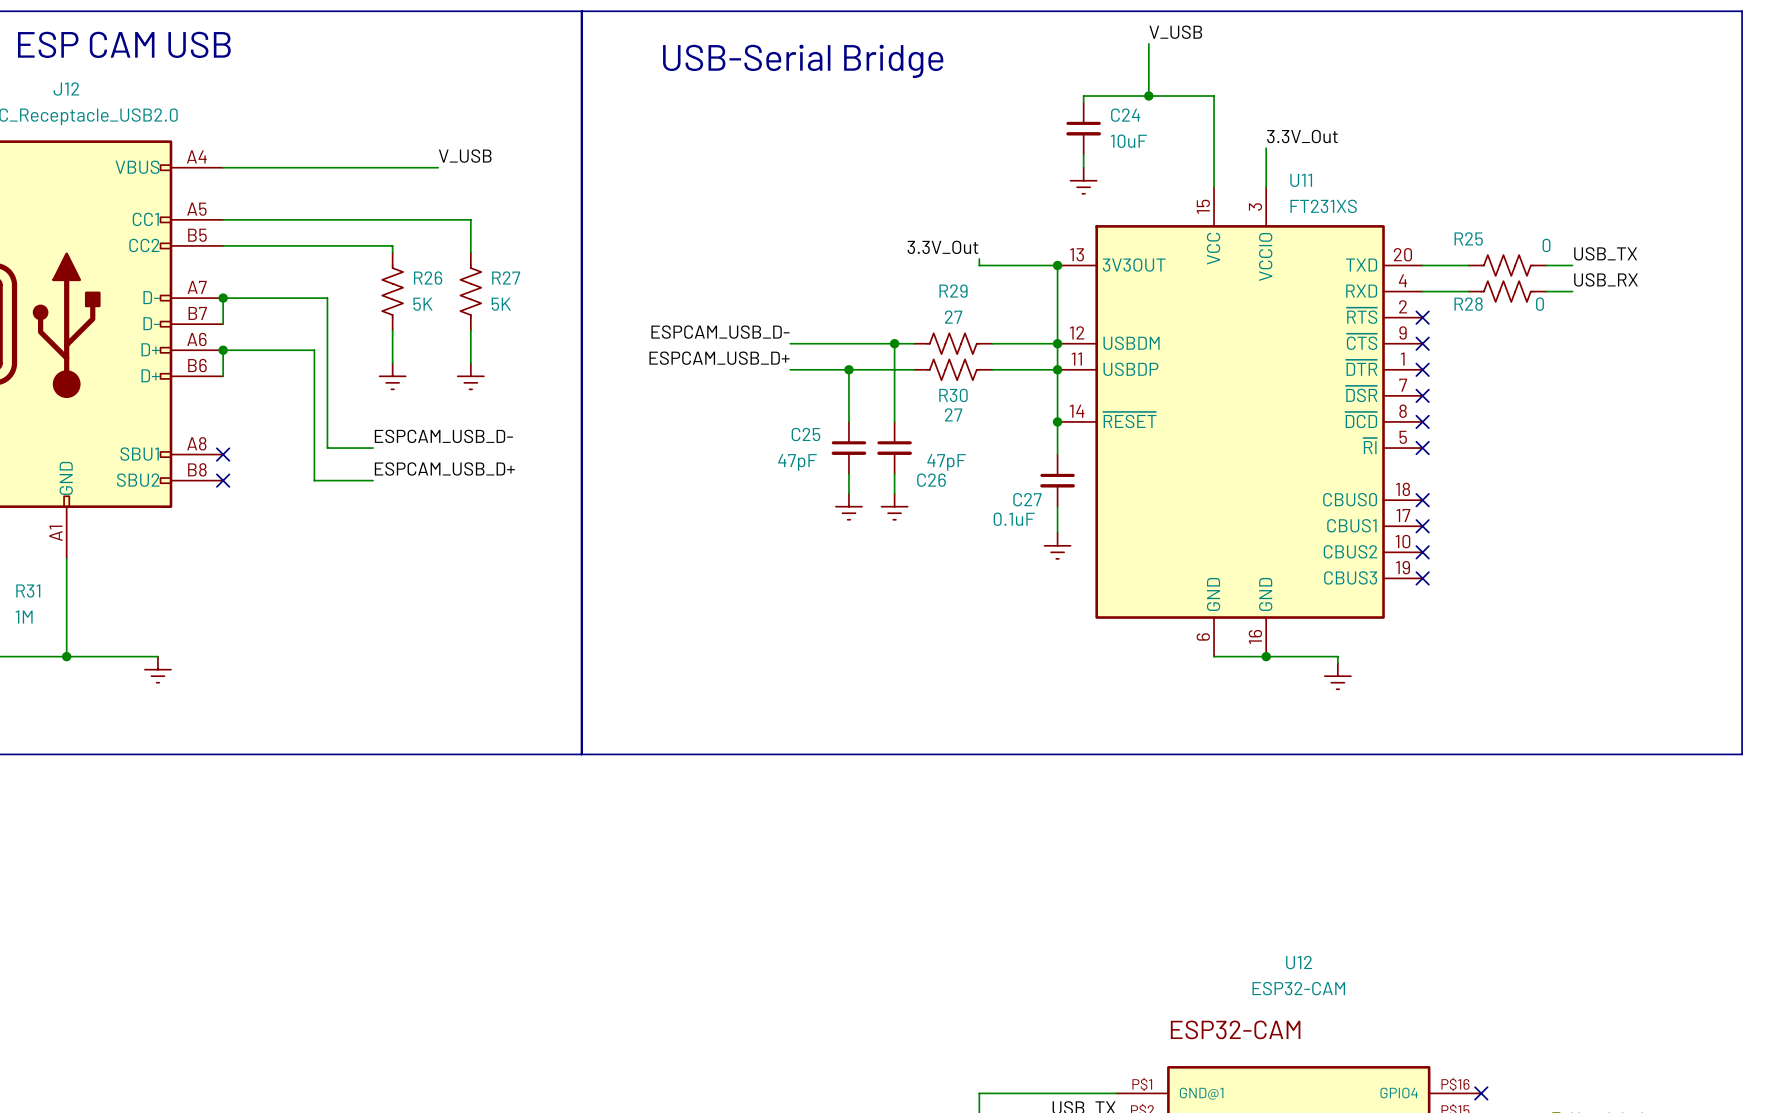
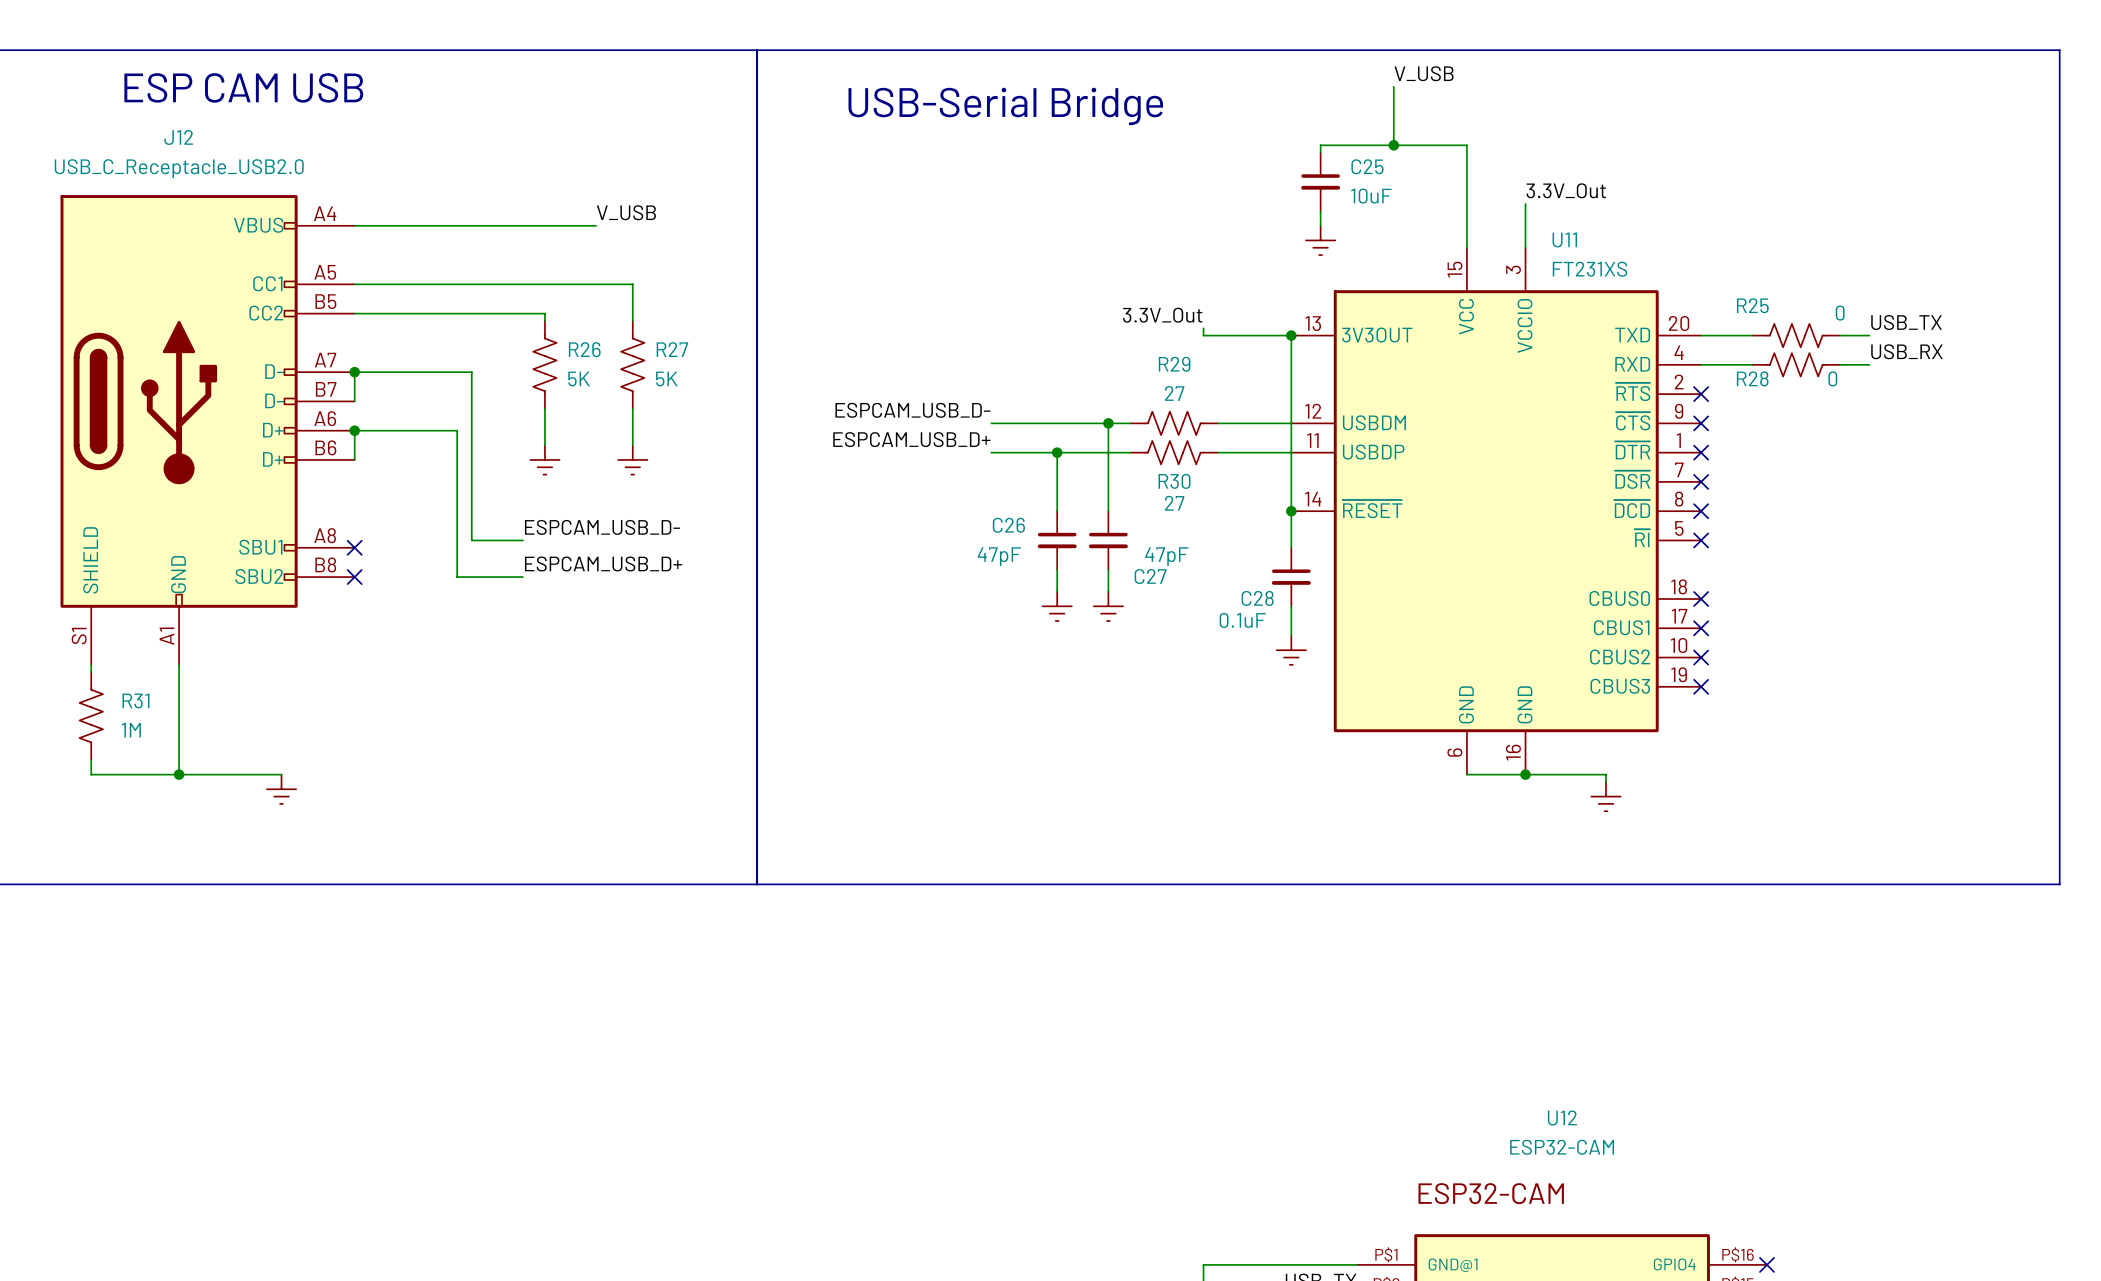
C24 name: C24 (1125, 115) -> C25 (1367, 166)
junction: (1057, 343) -> none
junction: (1057, 369) -> none
C25 name: C25 (805, 434) -> C26 (1008, 525)
C26 name: C26 (931, 480) -> C27 (1150, 576)
C27 name: C27 (1027, 499) -> C28 (1257, 598)

